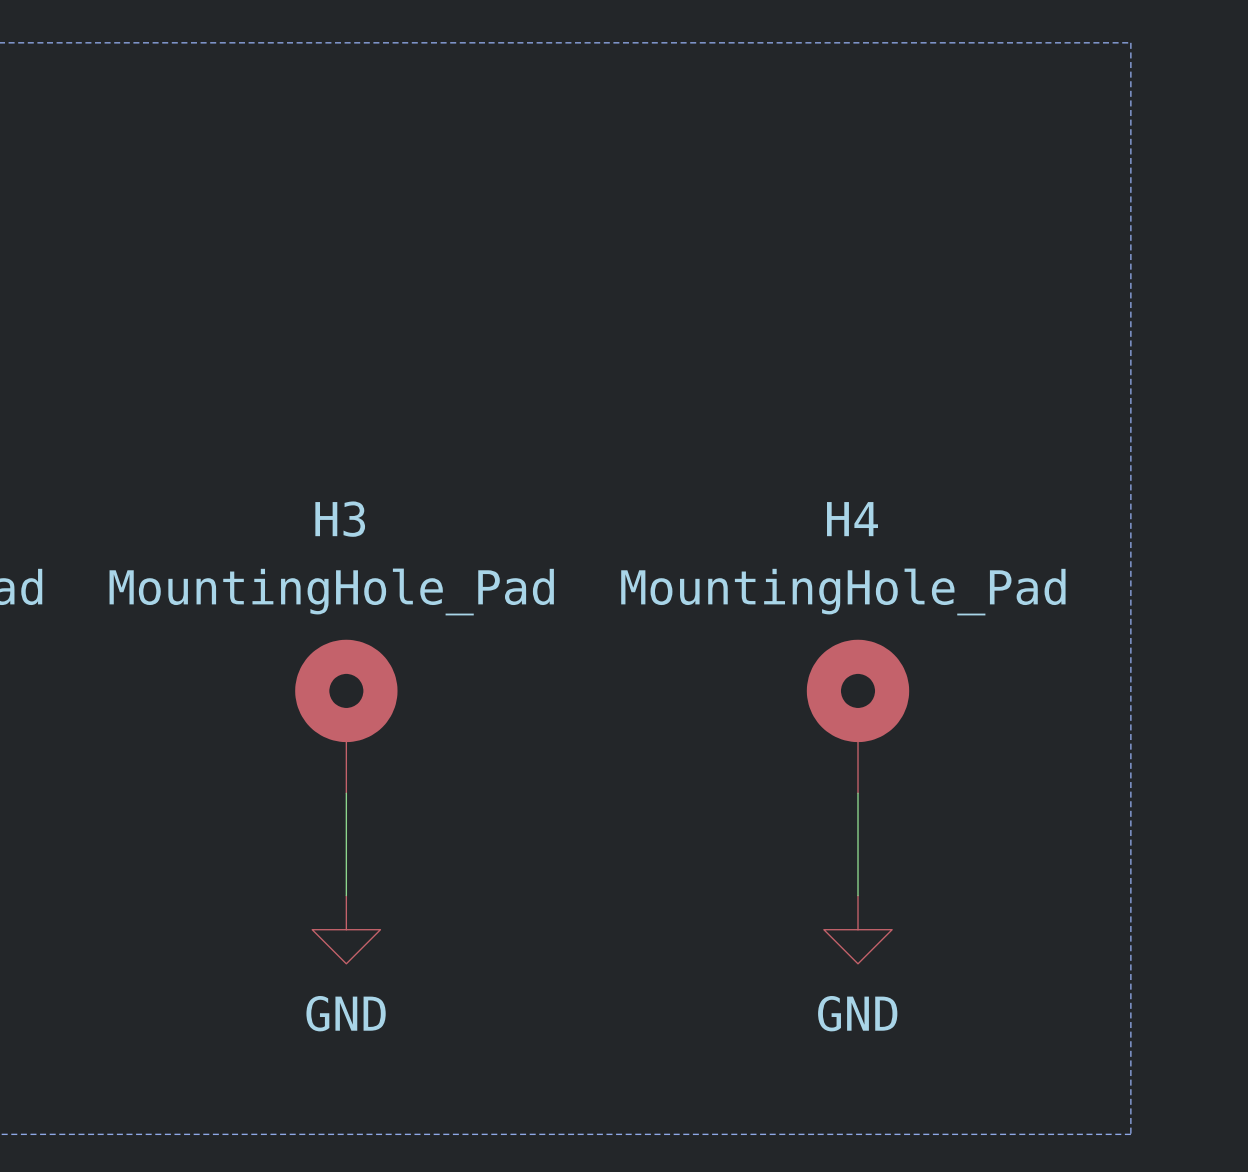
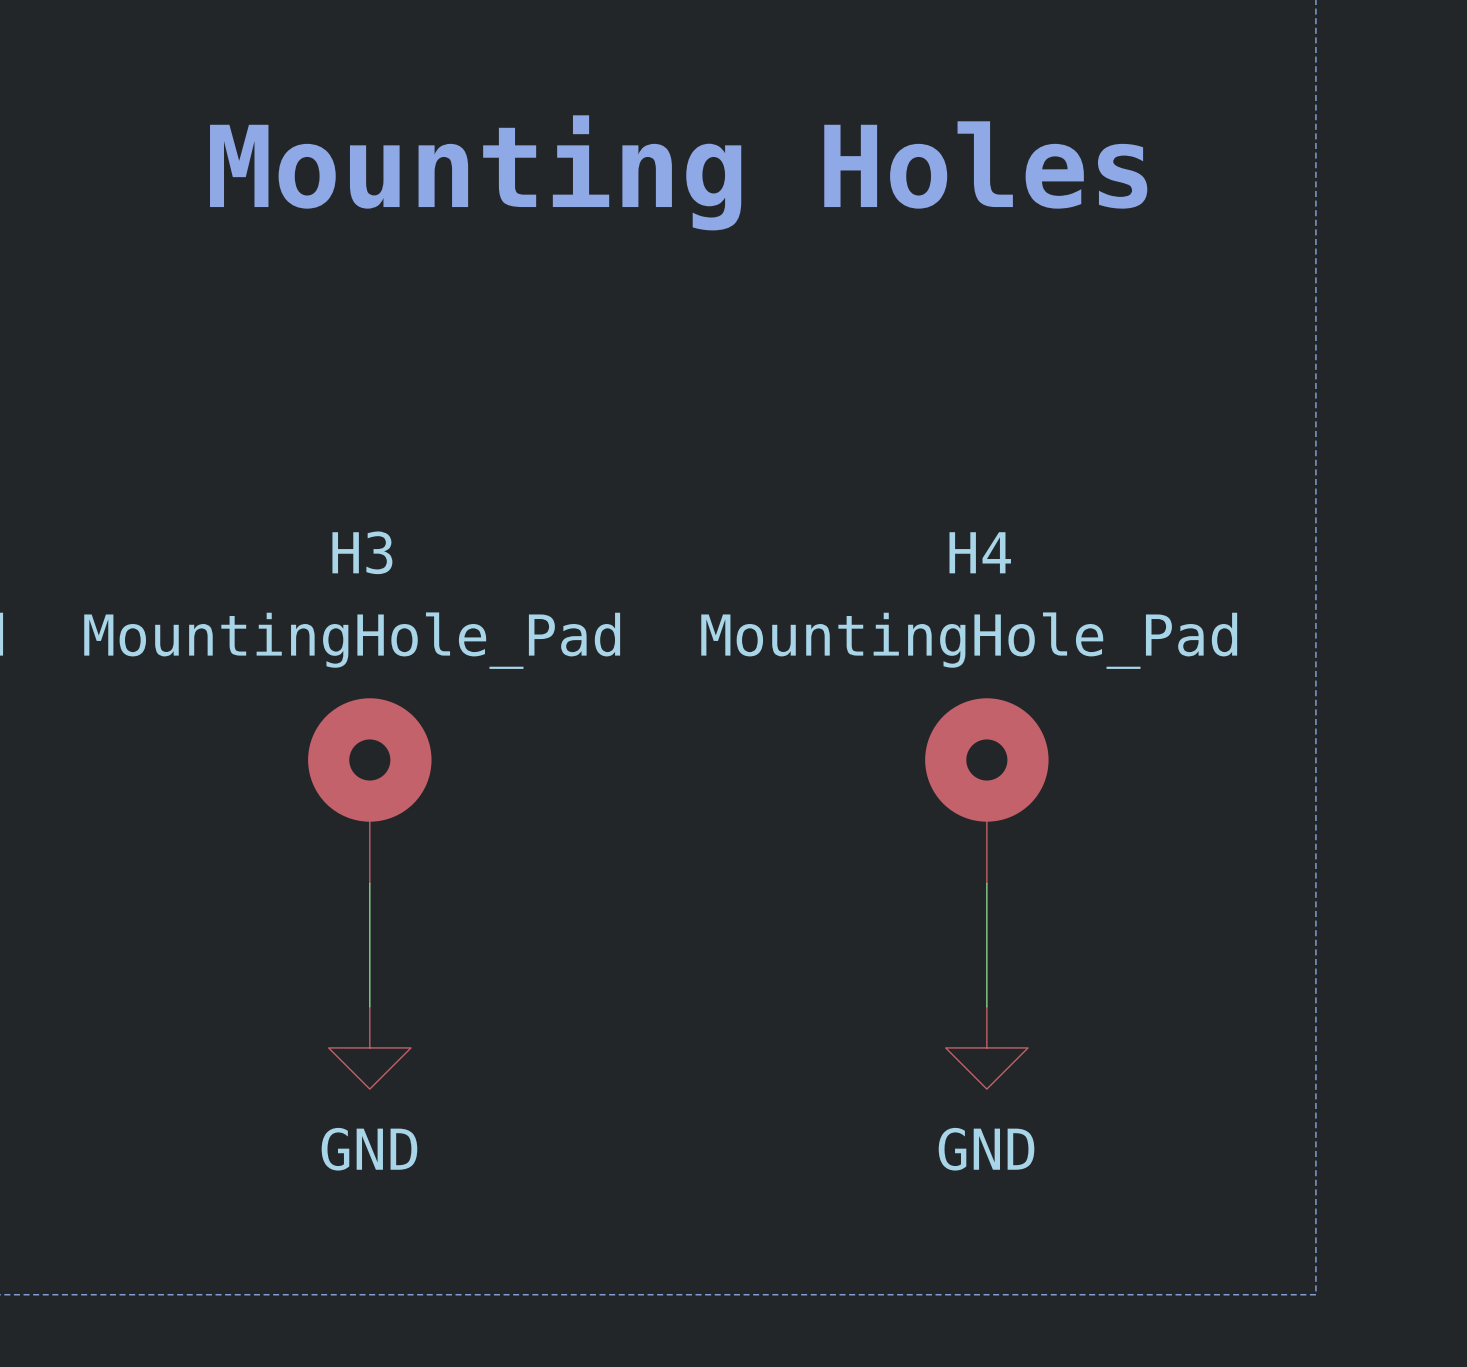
text: none -> Mounting Holes (678, 172)

